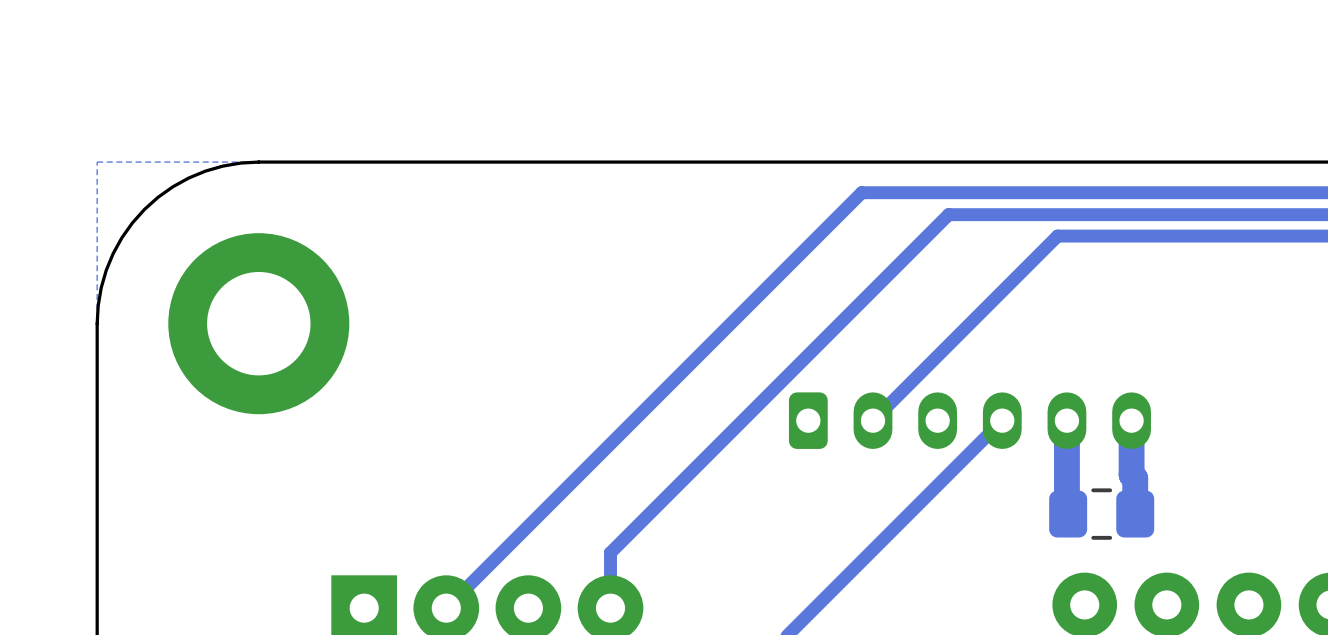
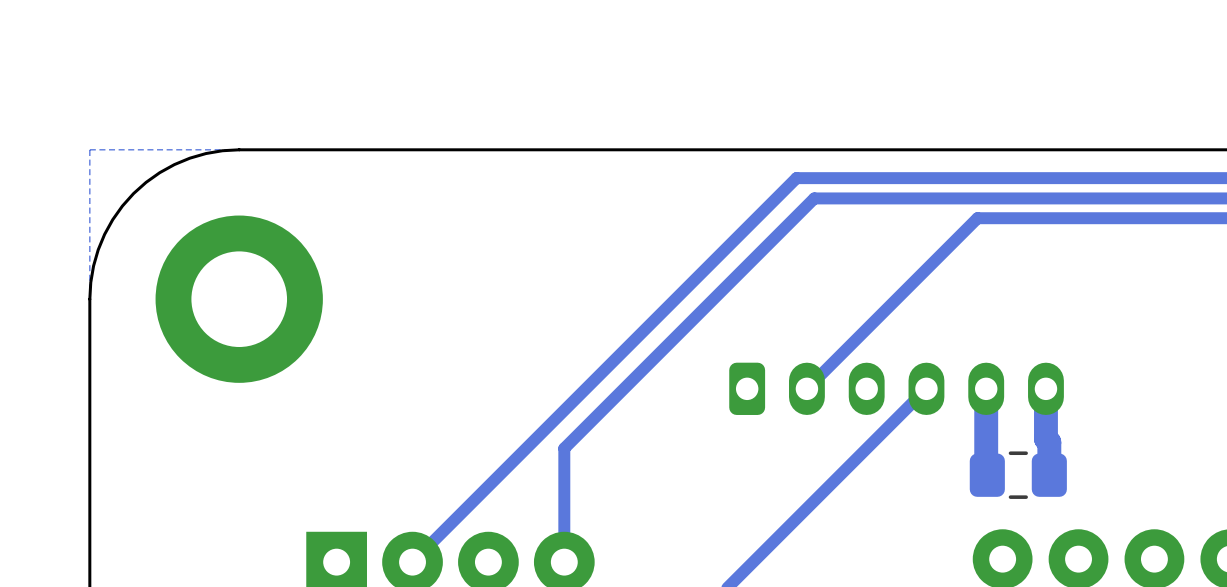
track: (948, 214) (610, 552) -> (876, 198) (814, 198) (564, 448) (564, 510)

